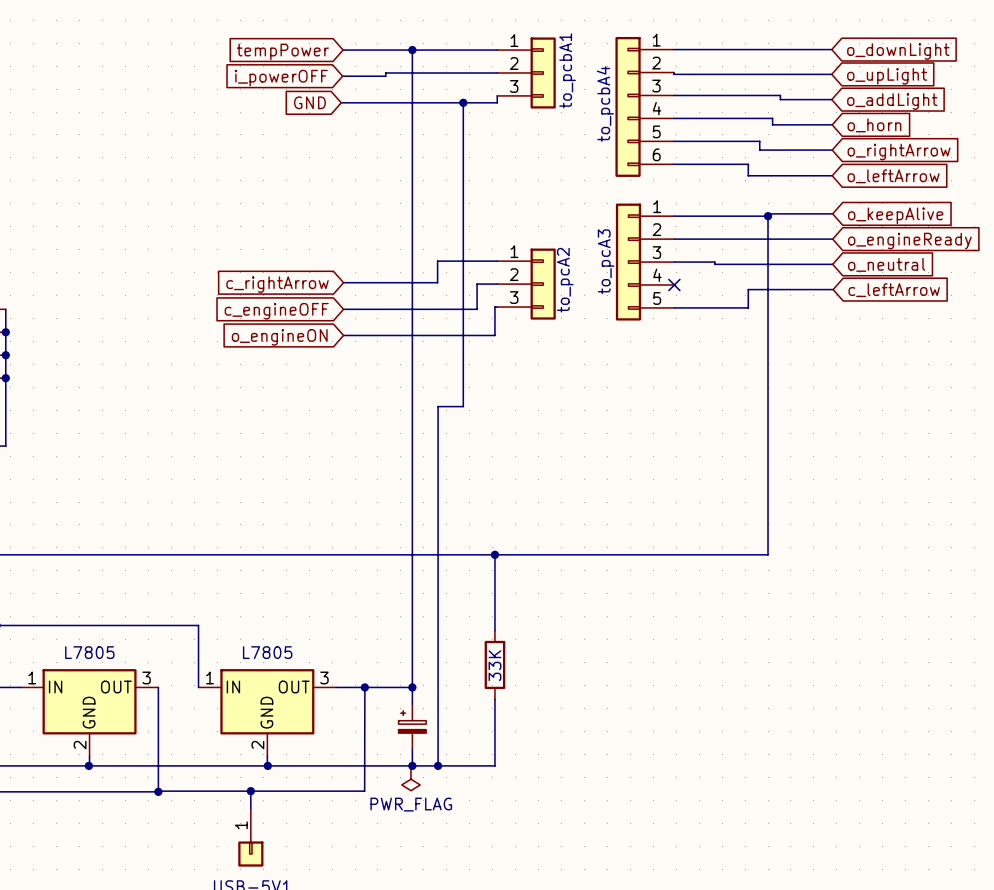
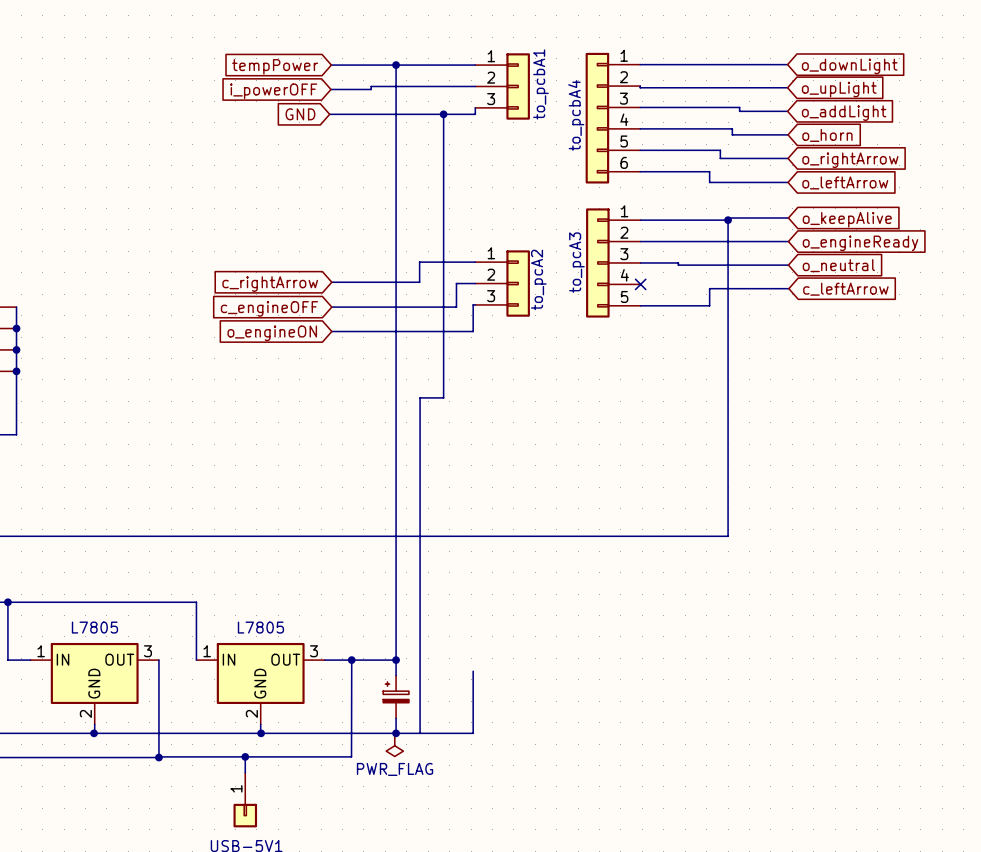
wire: (494, 554) (494, 630) -> none
junction: (494, 554) -> none
part: 33K (494, 664) -> none
junction: (438, 765) -> none

